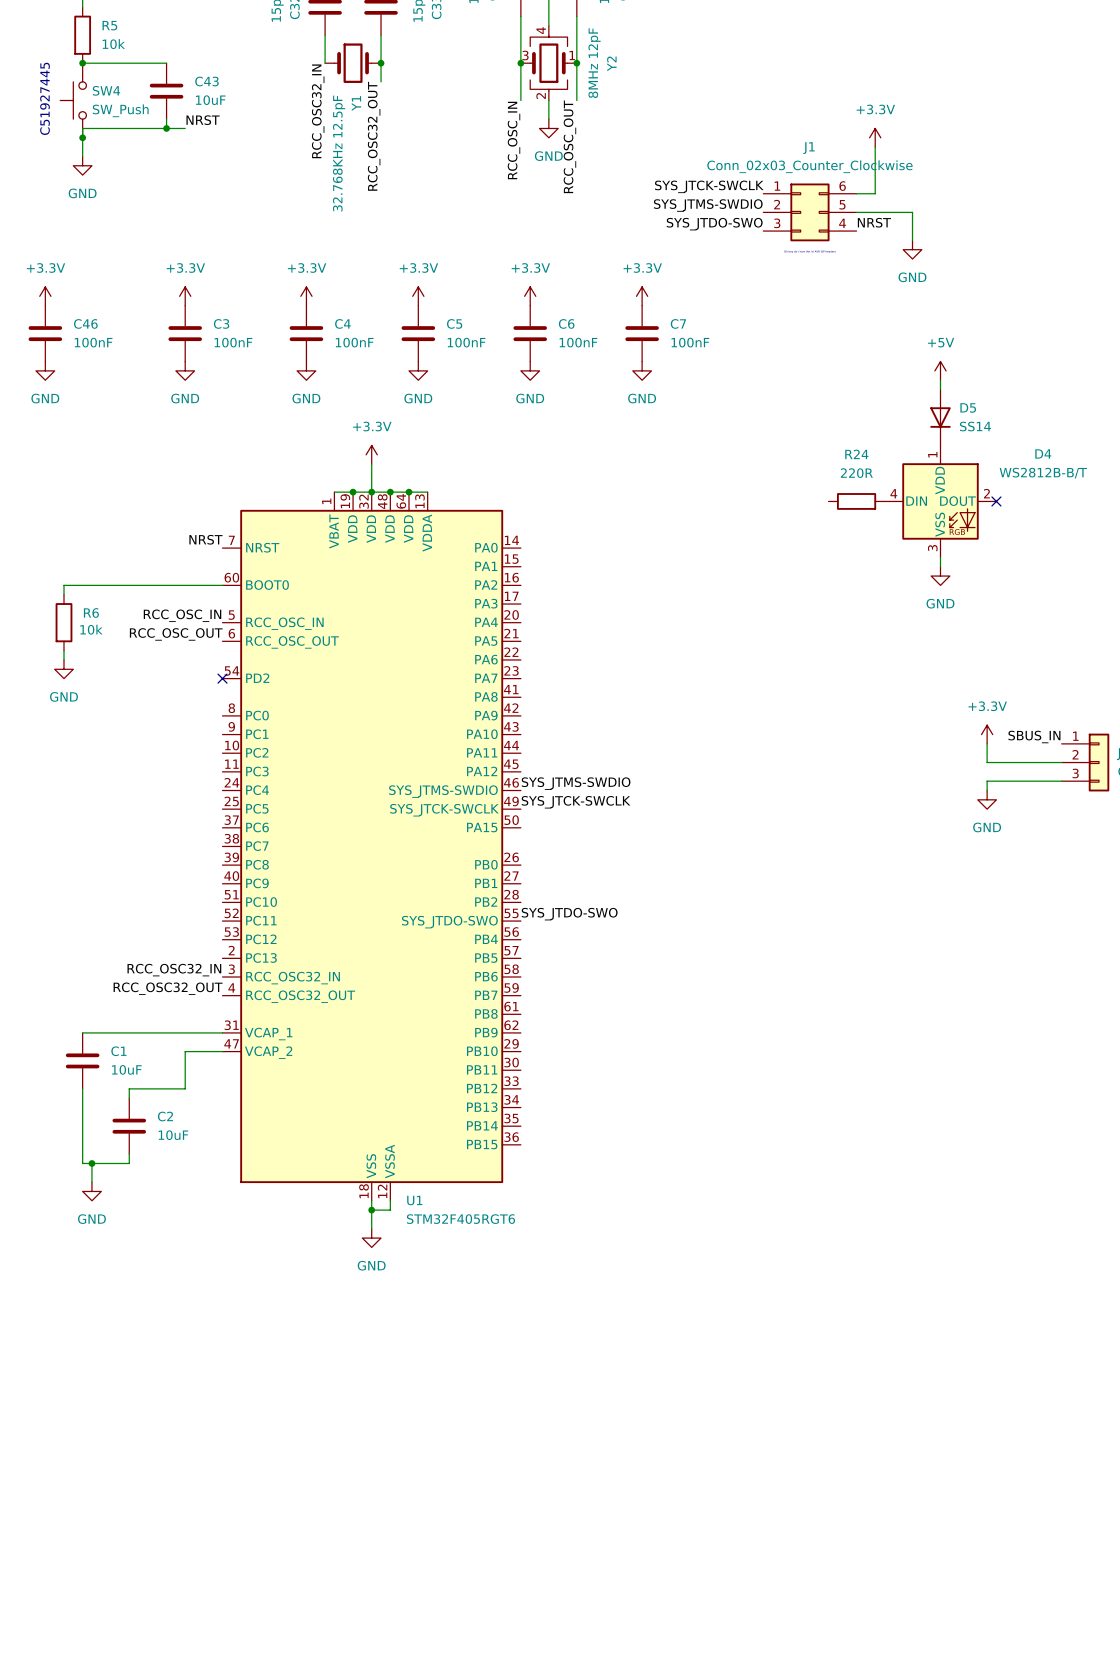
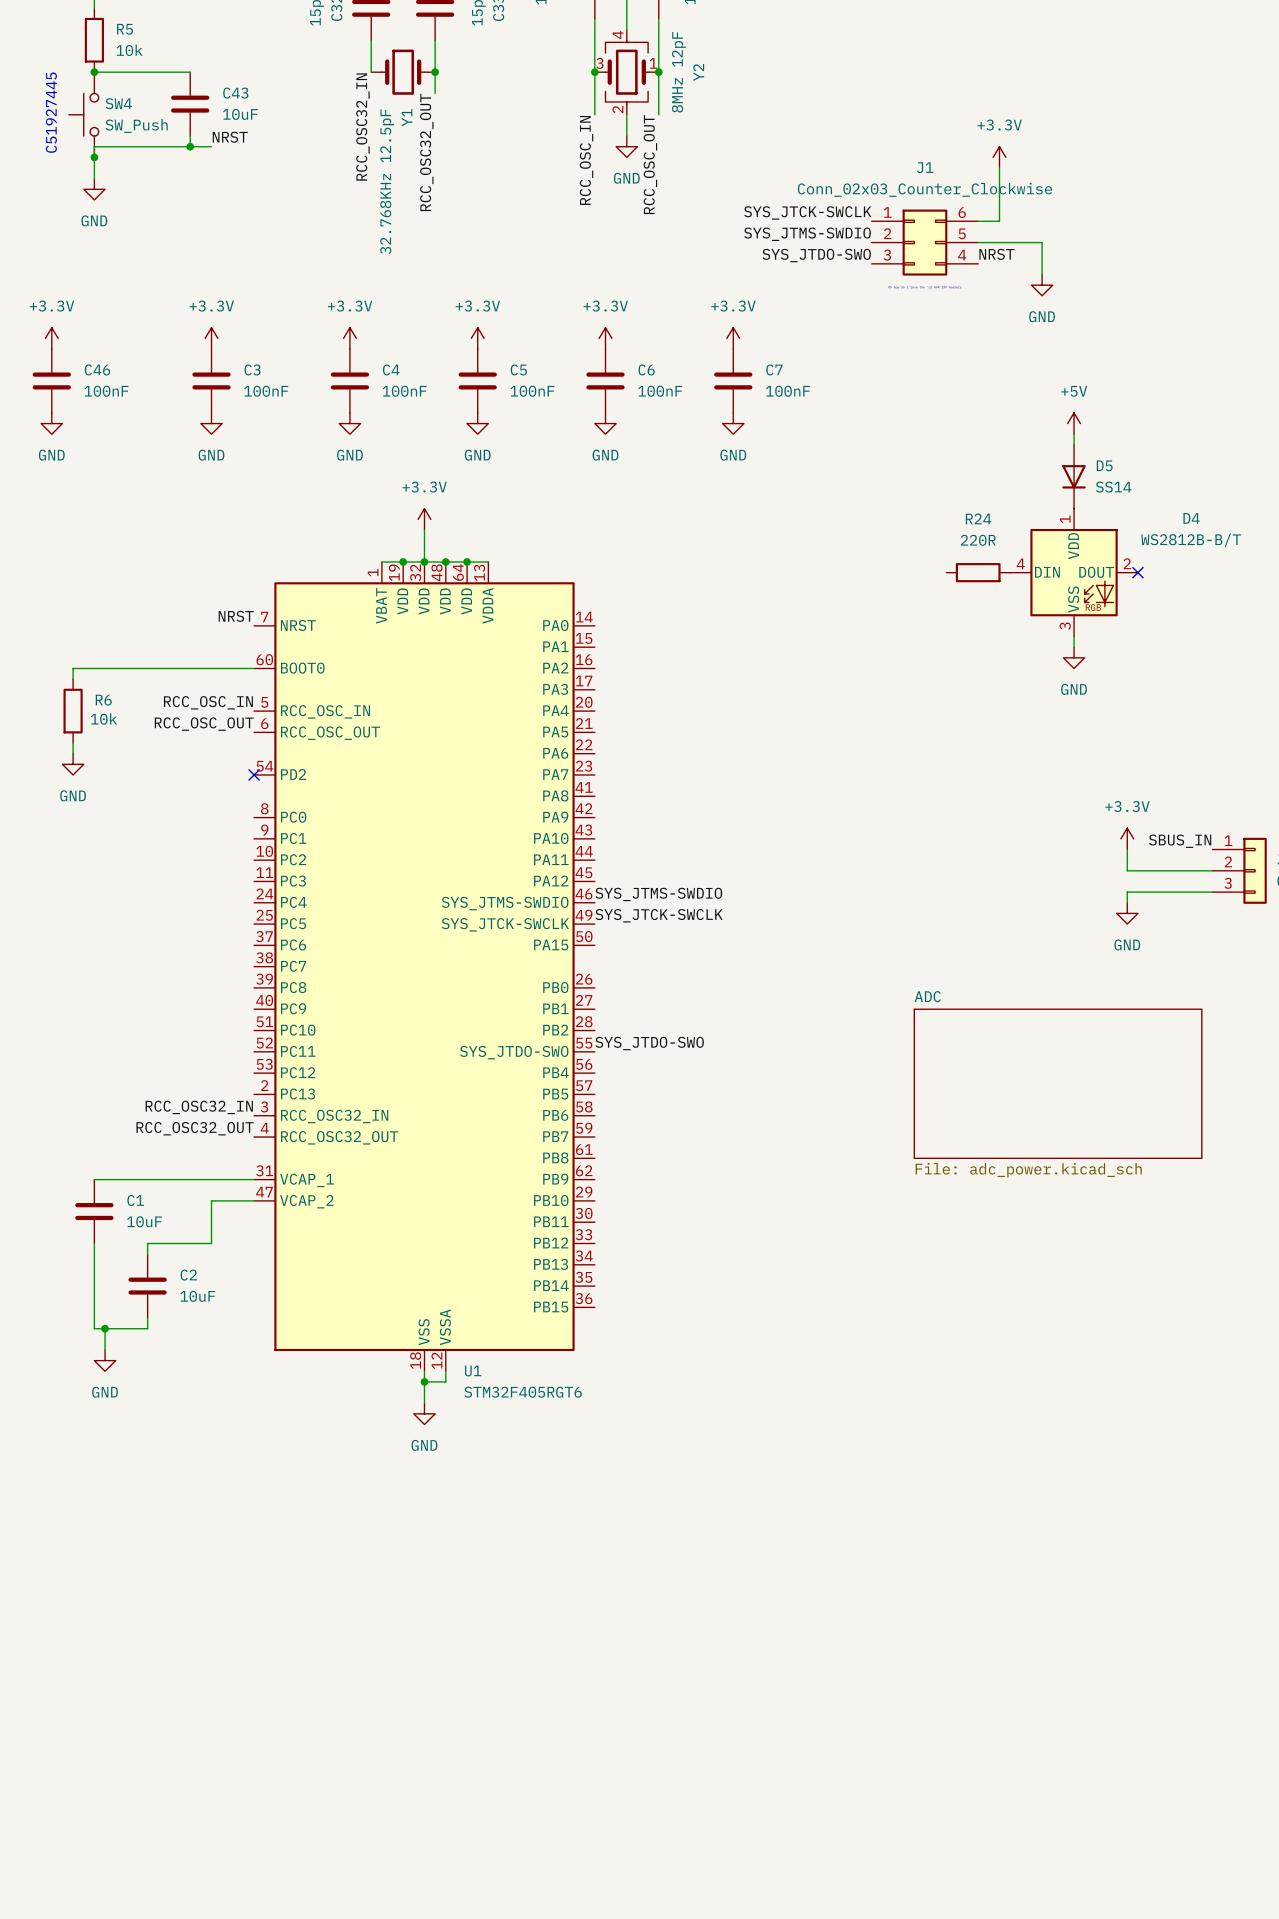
sheet ADC: none -> File: adc_power.kicad_sch (1058, 1083)

